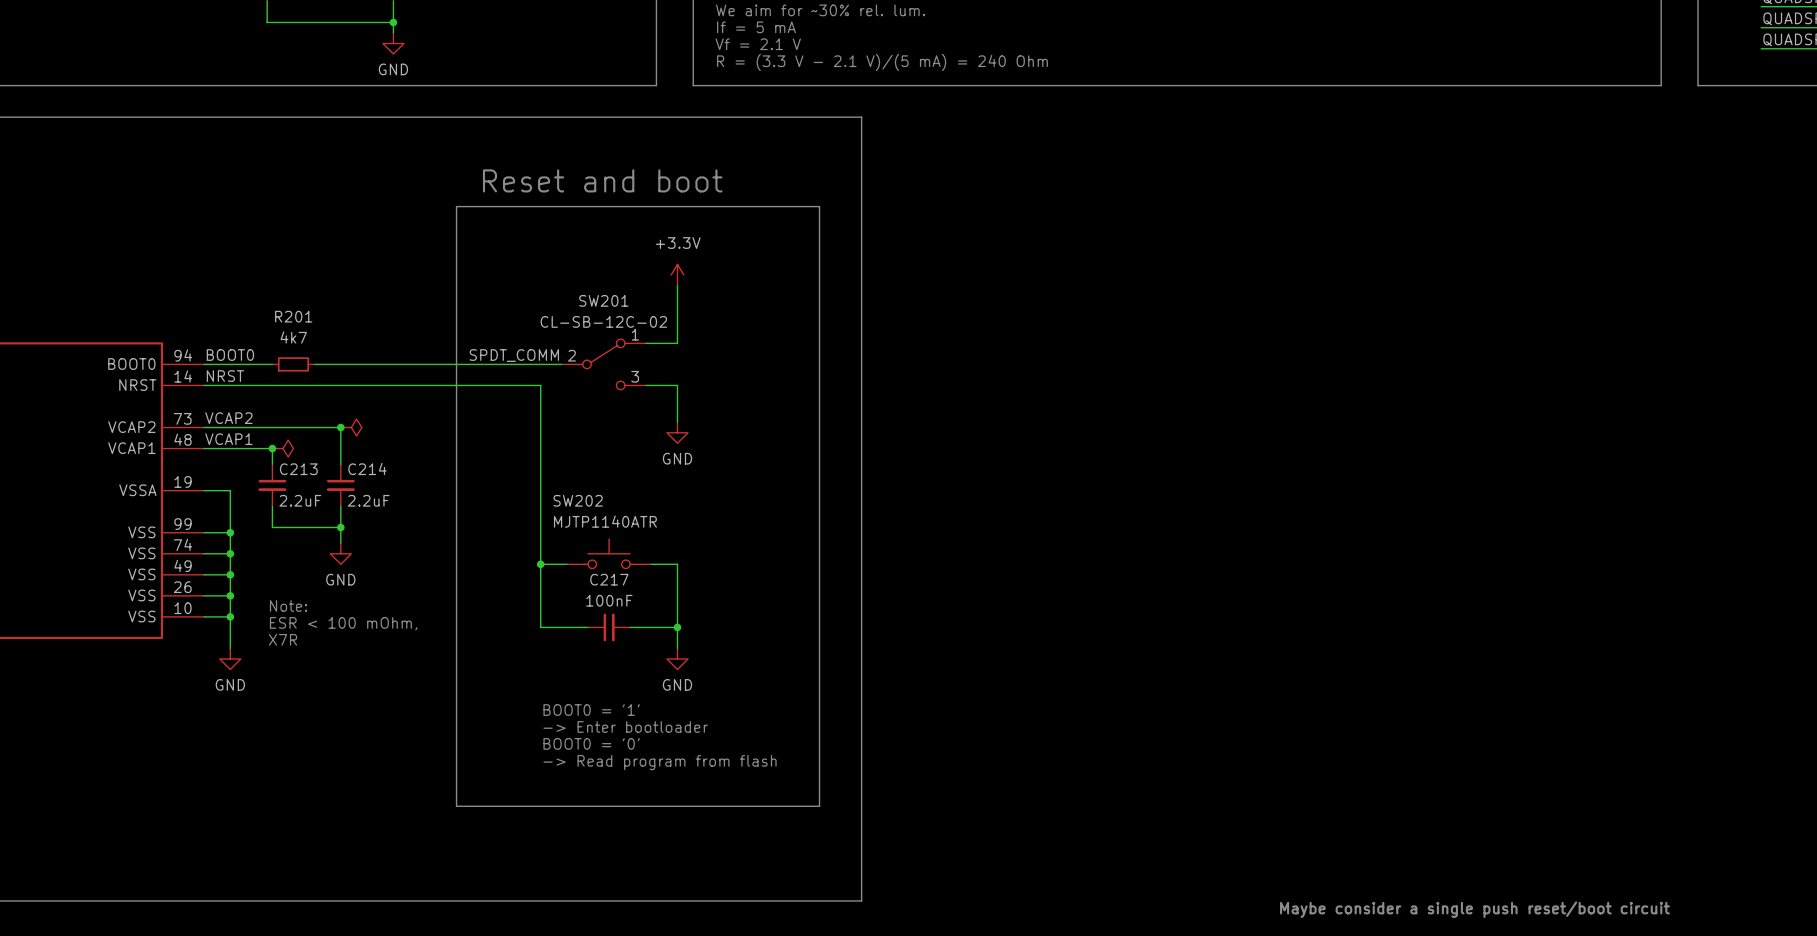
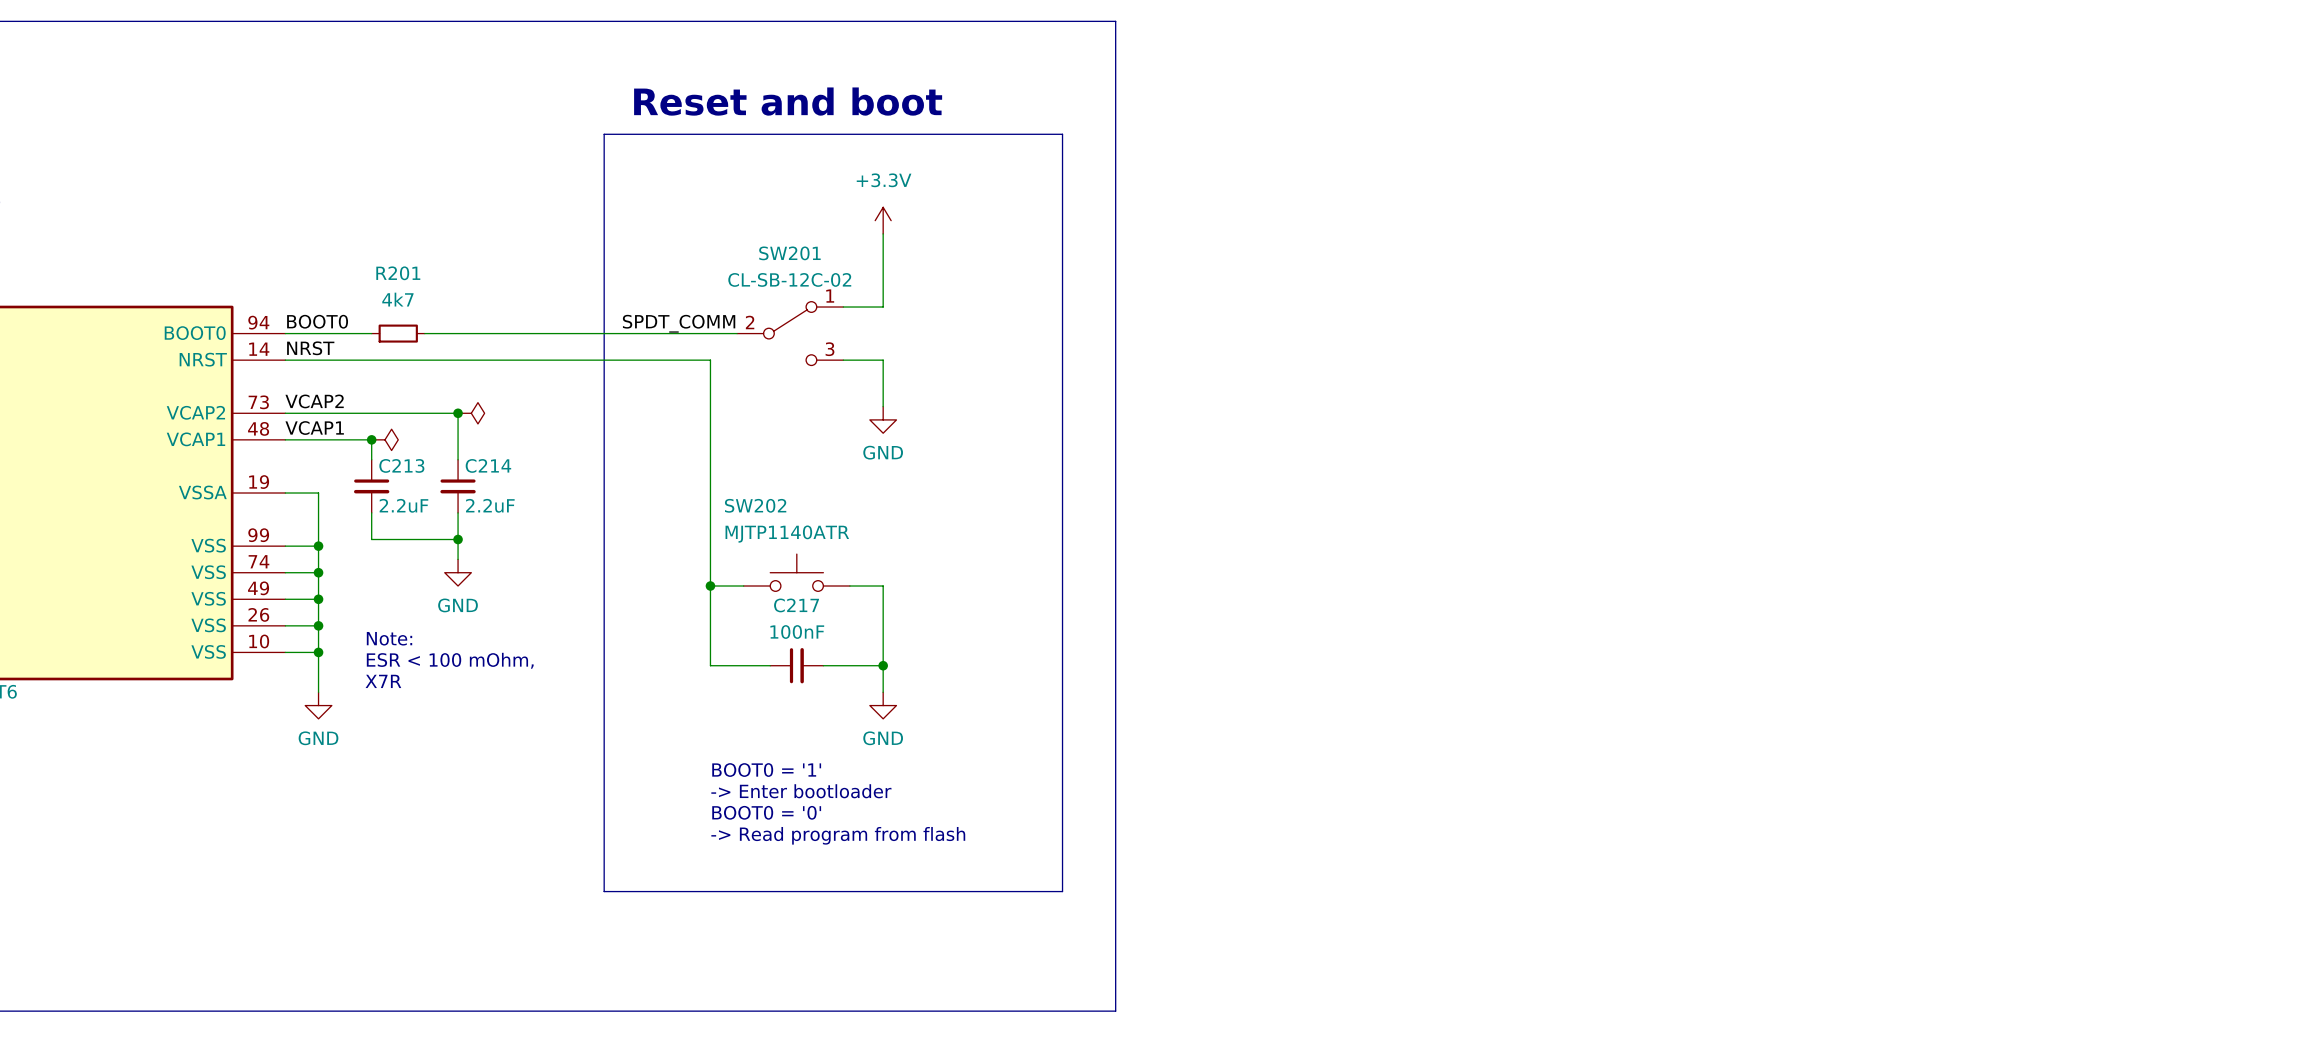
text: Maybe consider a single push reset/boot circuit (1474, 909) -> none

